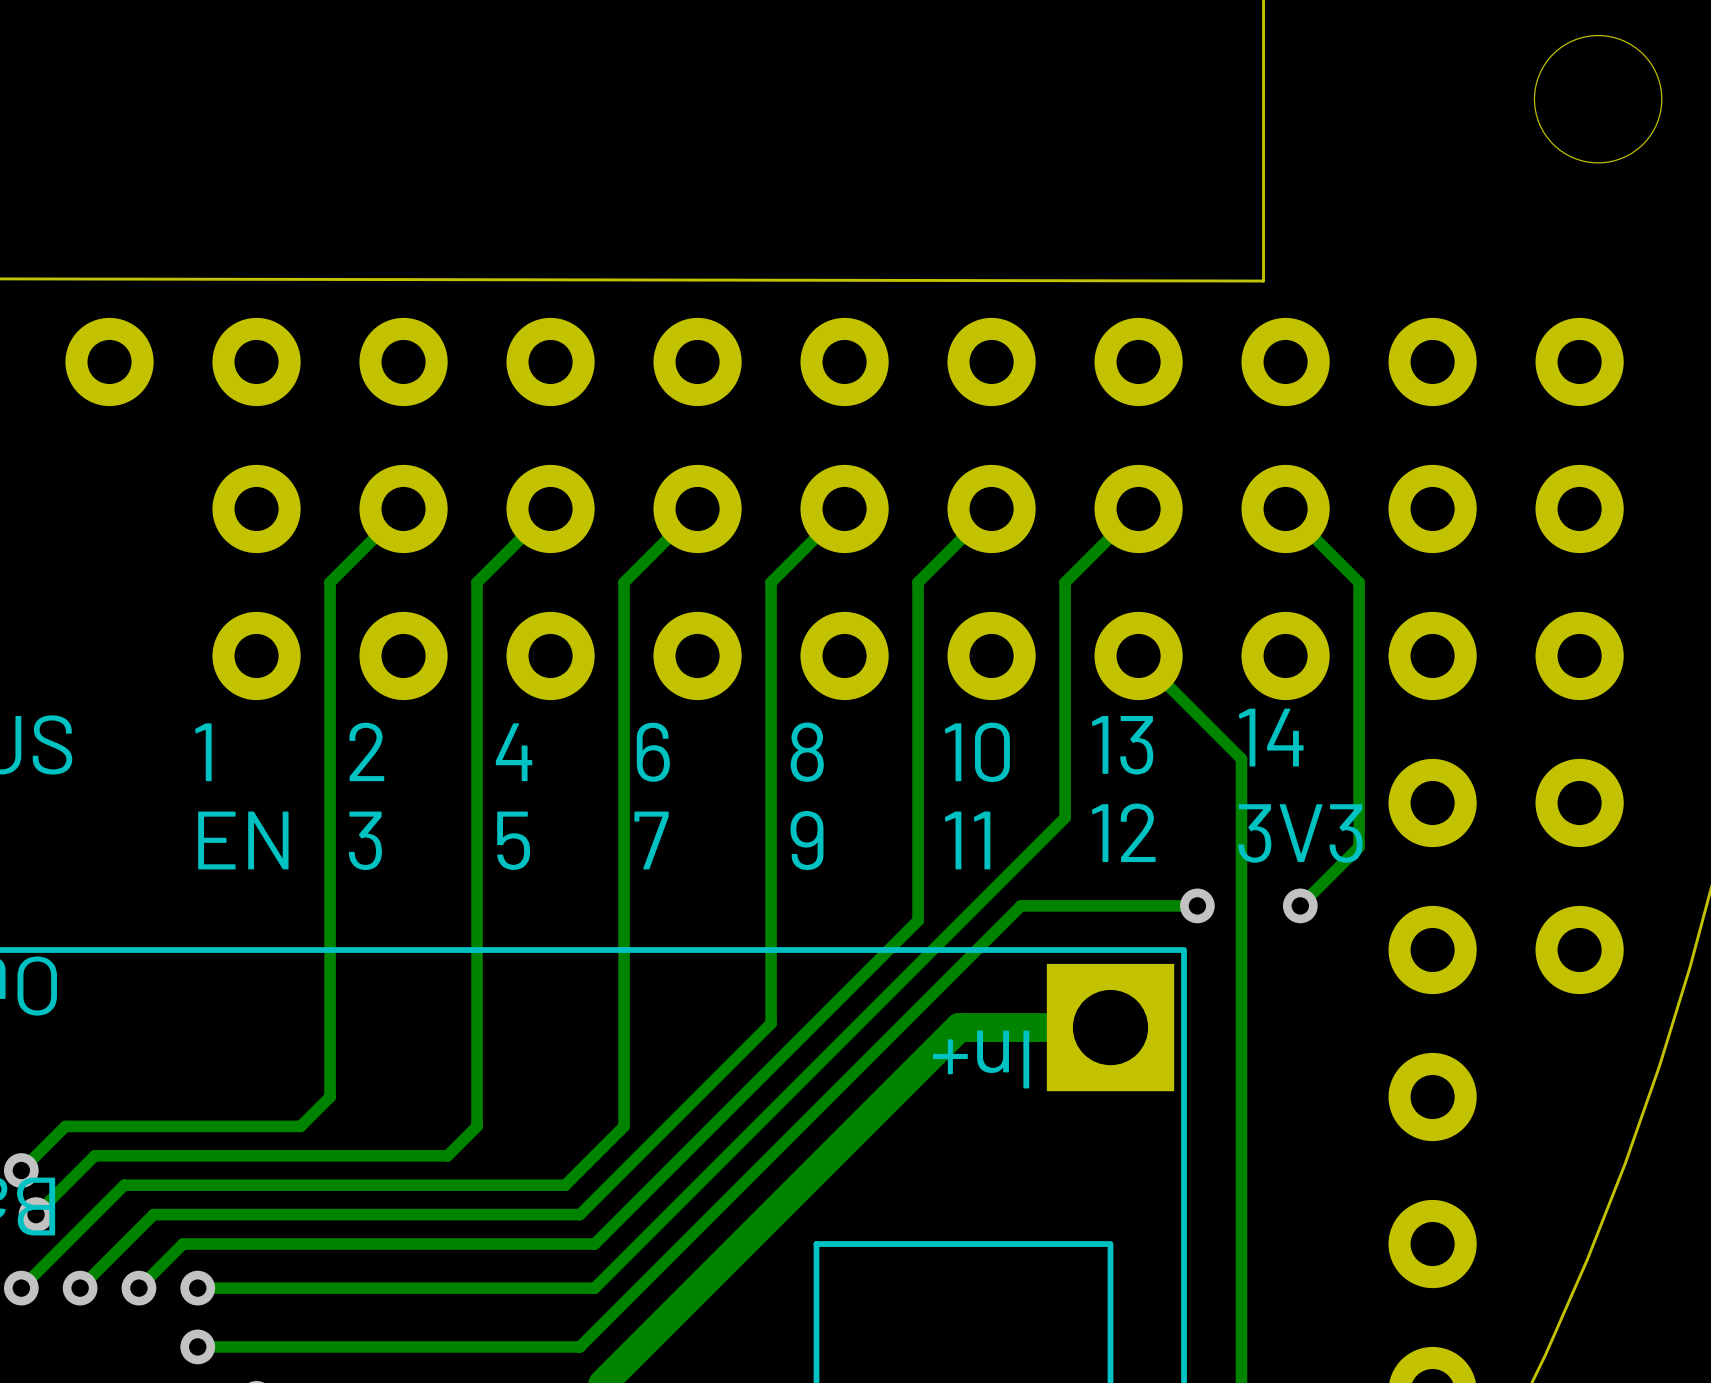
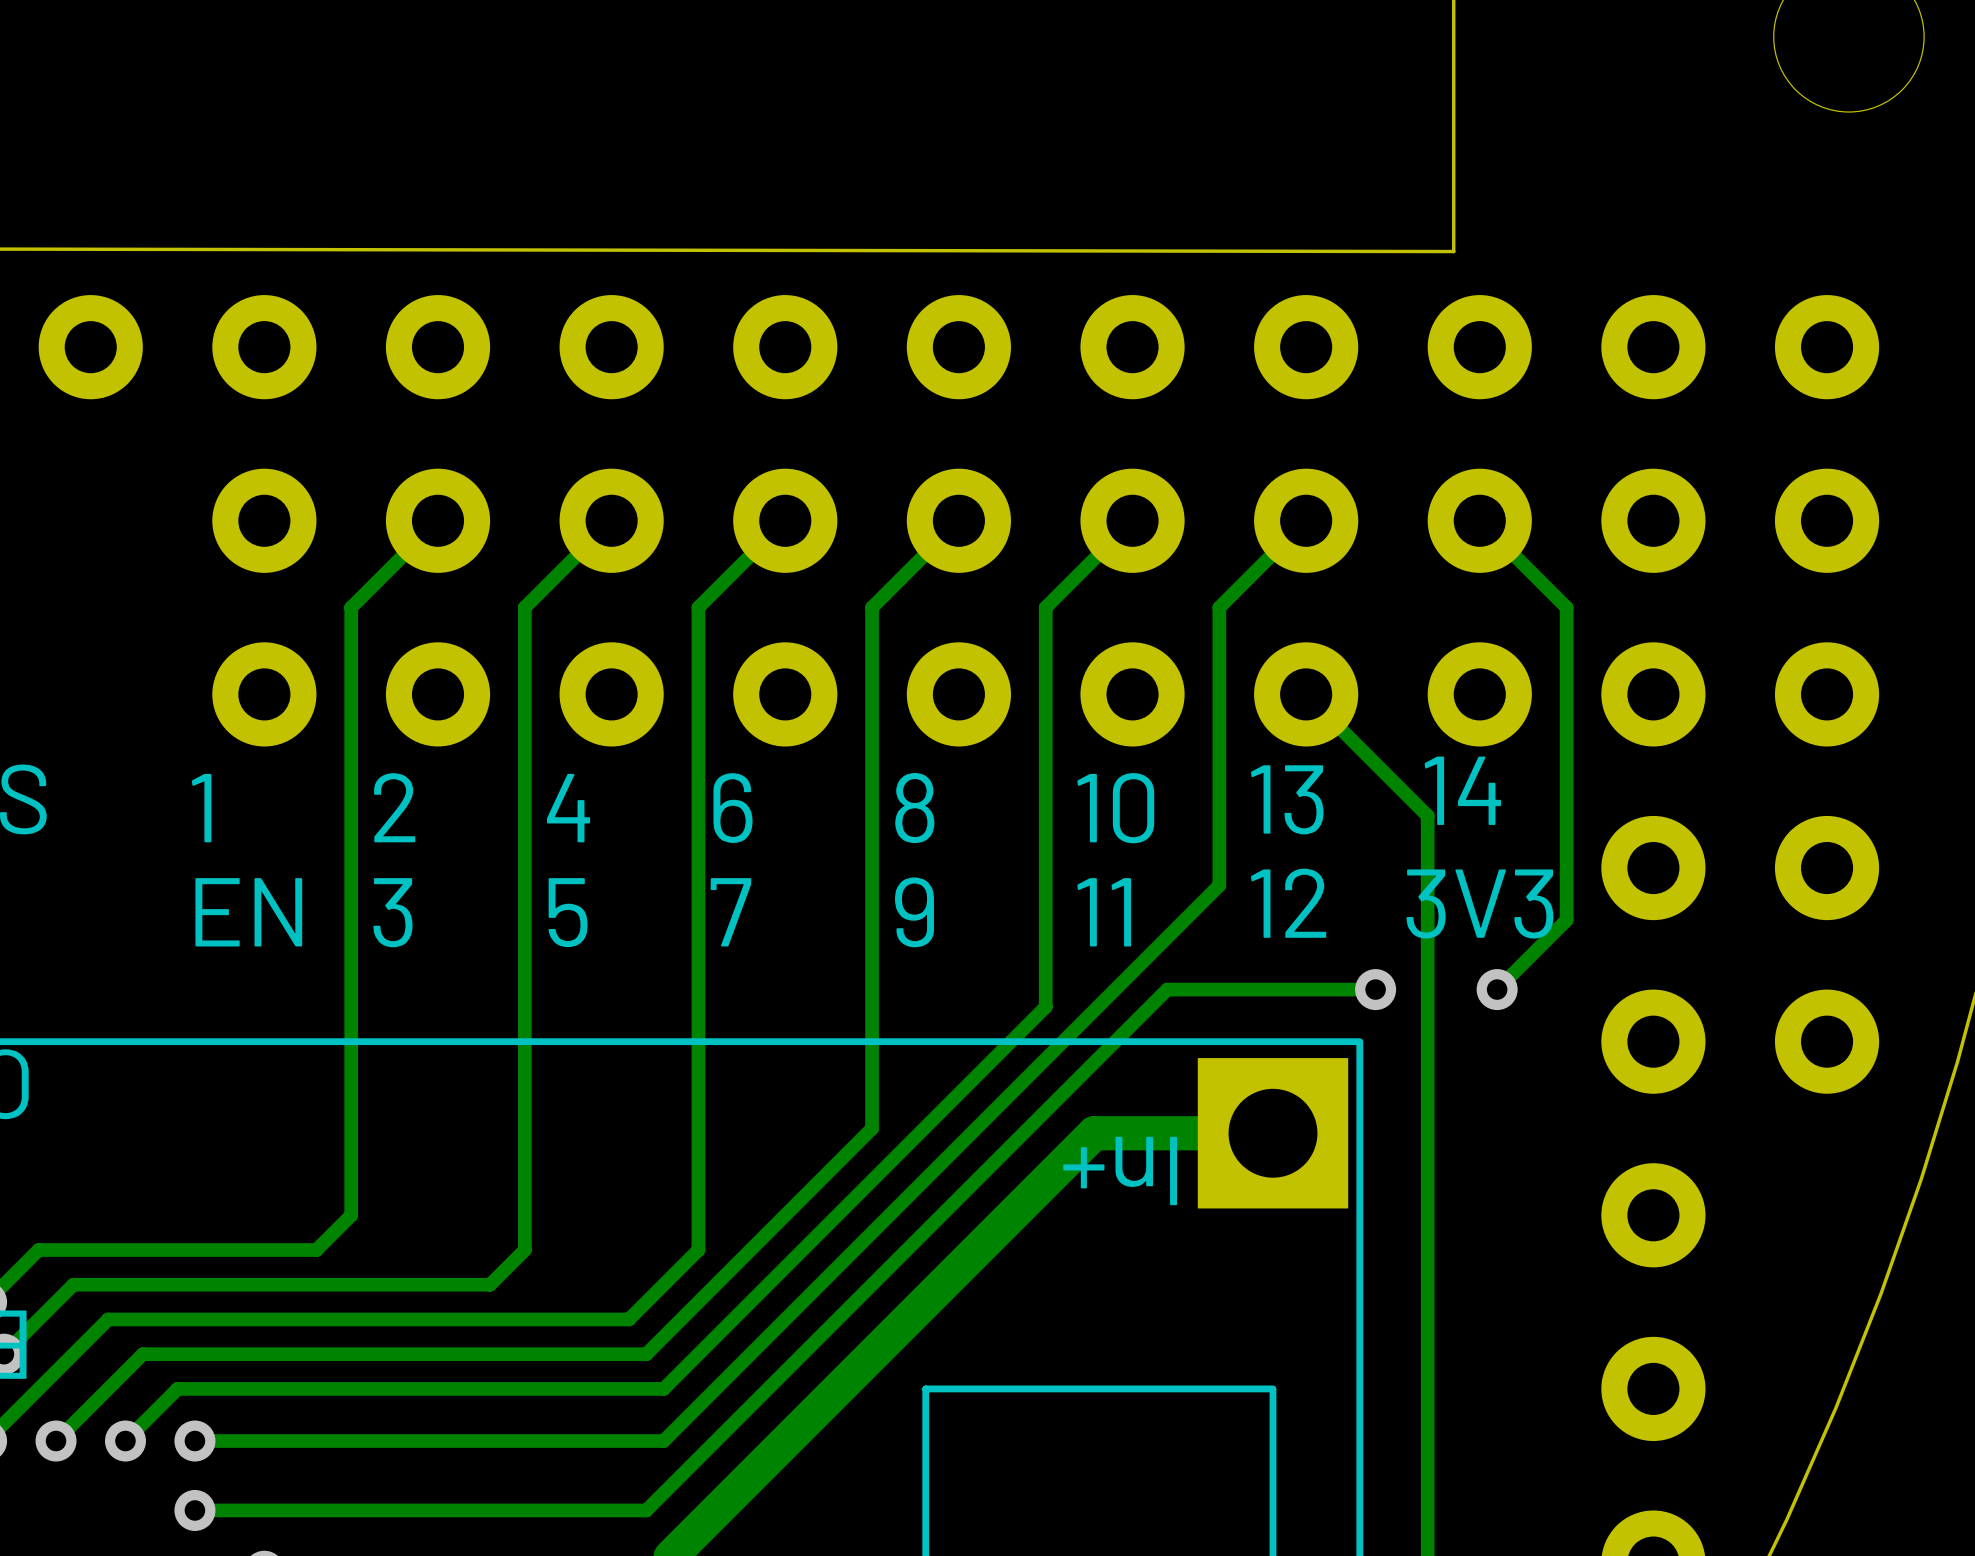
text position: 3V3 (1300, 833) -> 3V3 (1479, 904)

